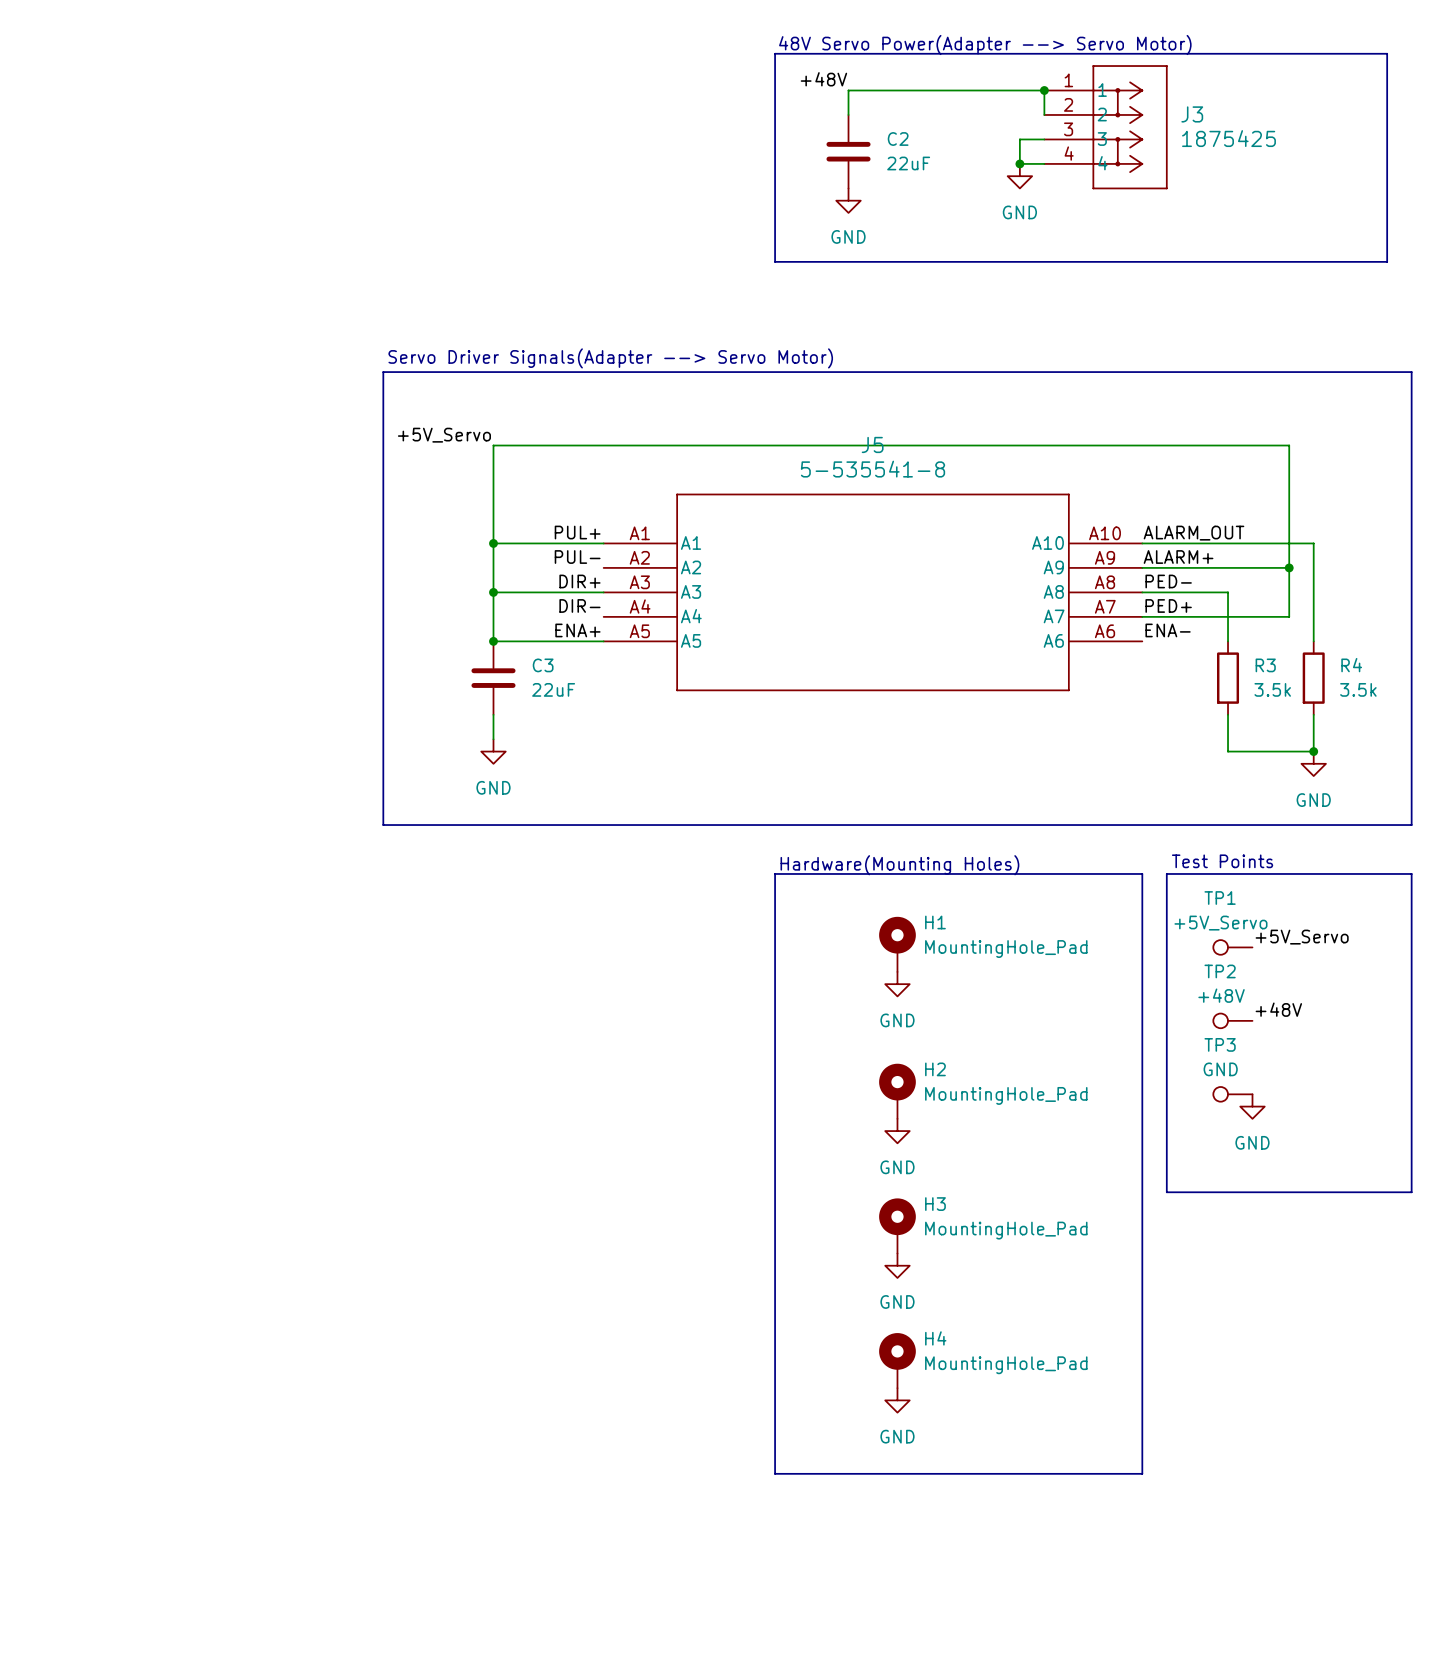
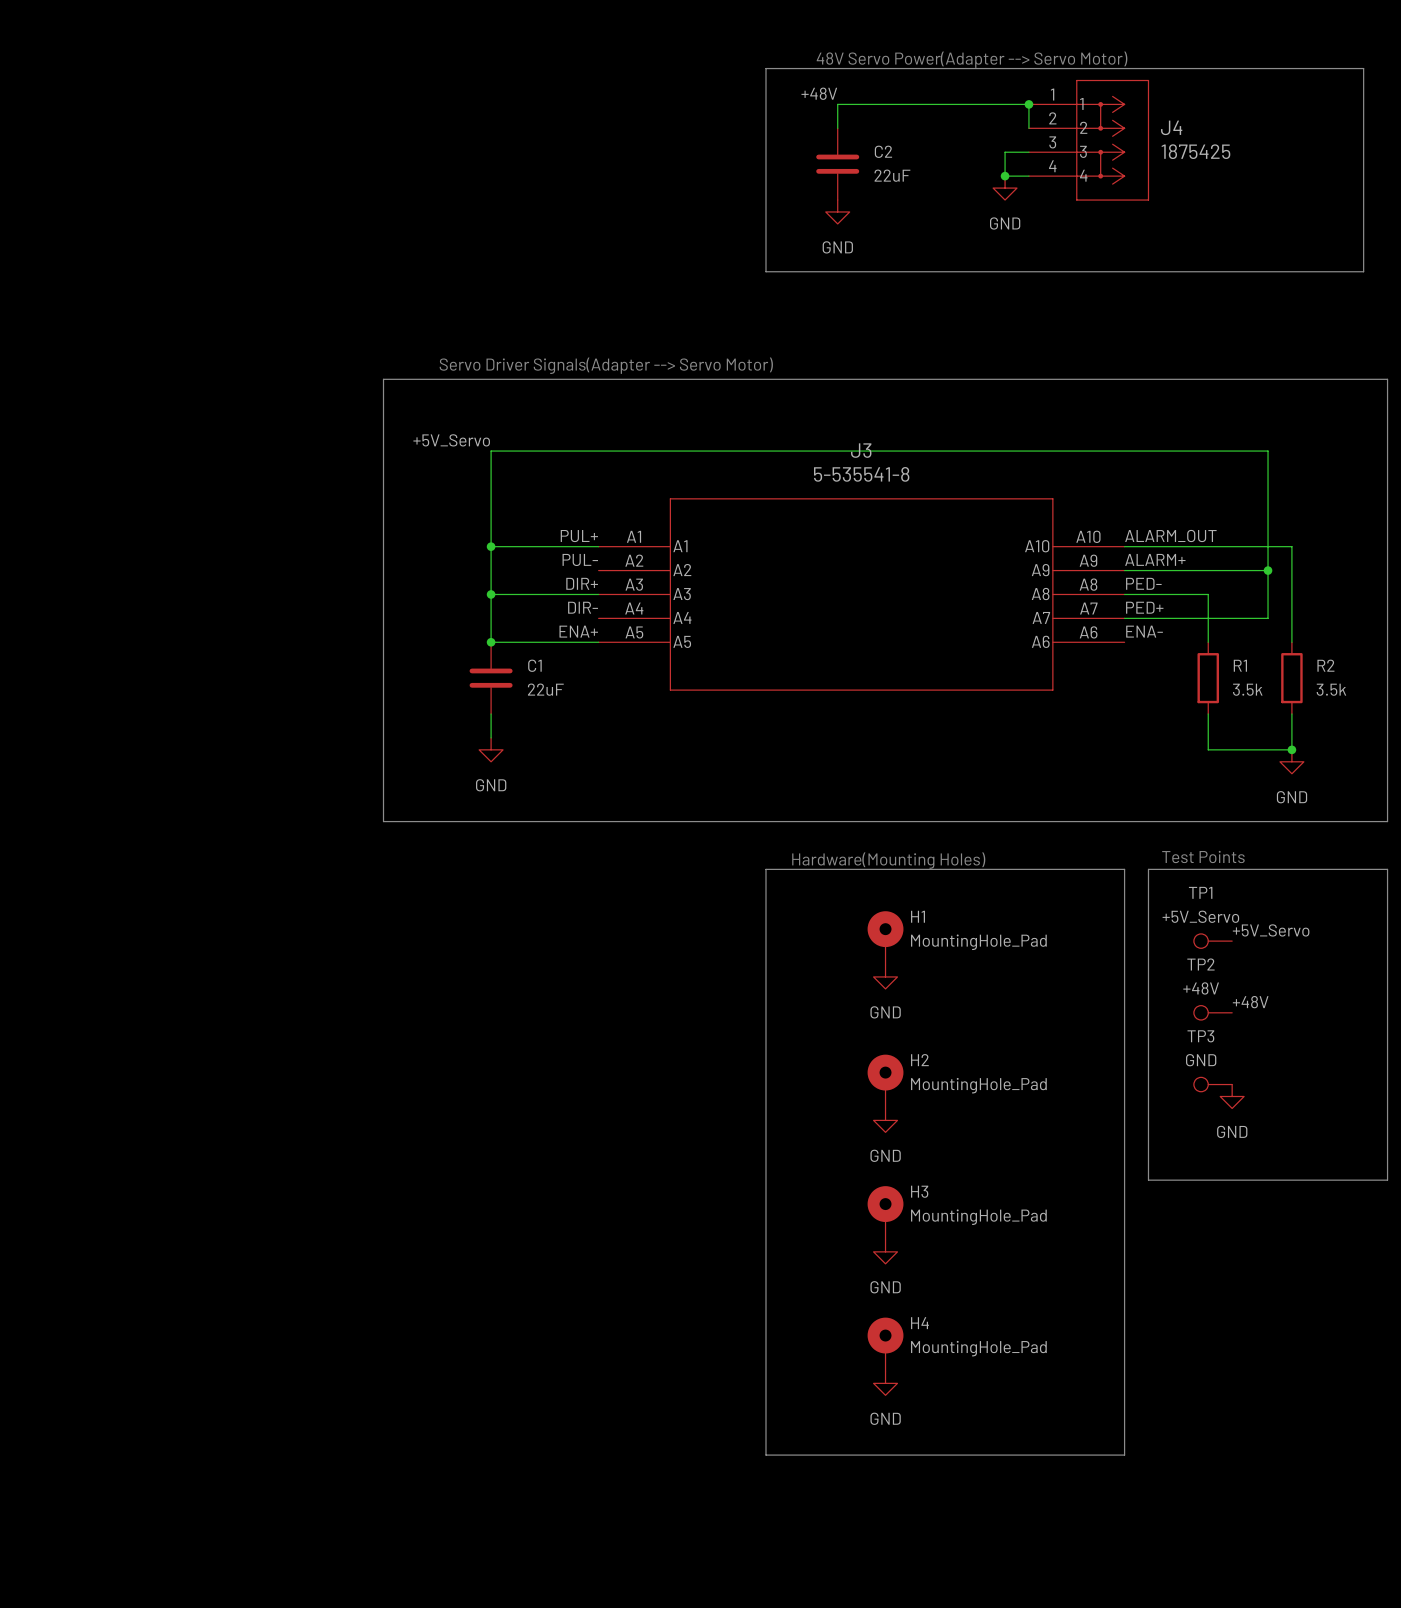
J3 name: J3 (1192, 114) -> J4 (1171, 127)
J5 name: J5 (872, 444) -> J3 (861, 450)
C3 name: C3 (543, 665) -> C1 (534, 665)
R3 name: R3 (1265, 665) -> R1 (1240, 665)
R4 name: R4 (1351, 665) -> R2 (1325, 665)

